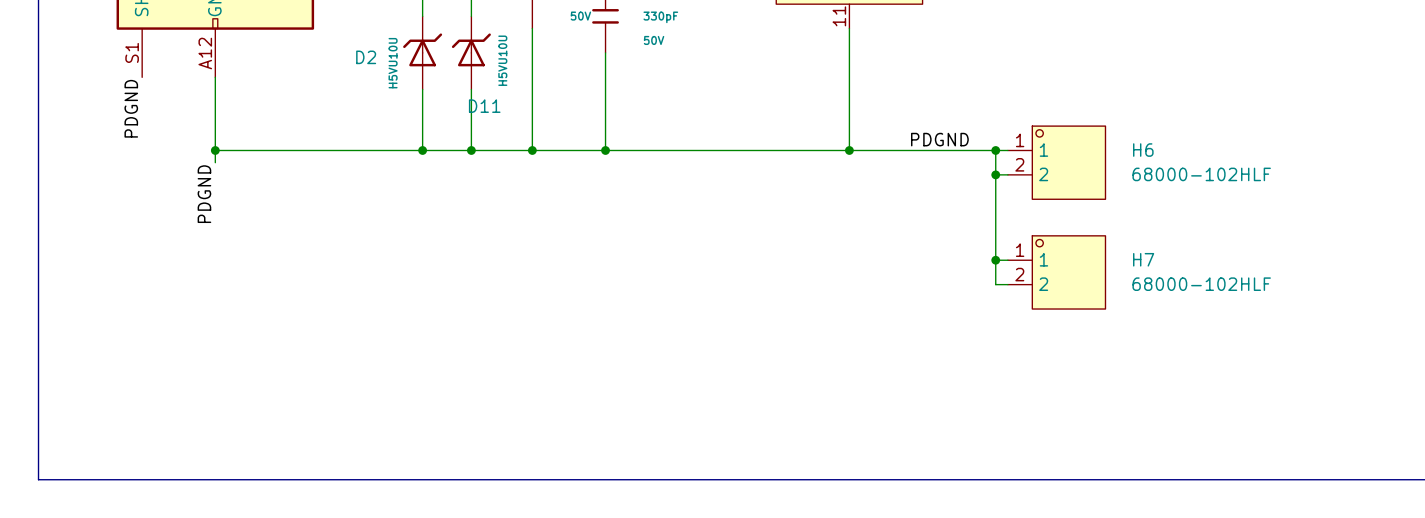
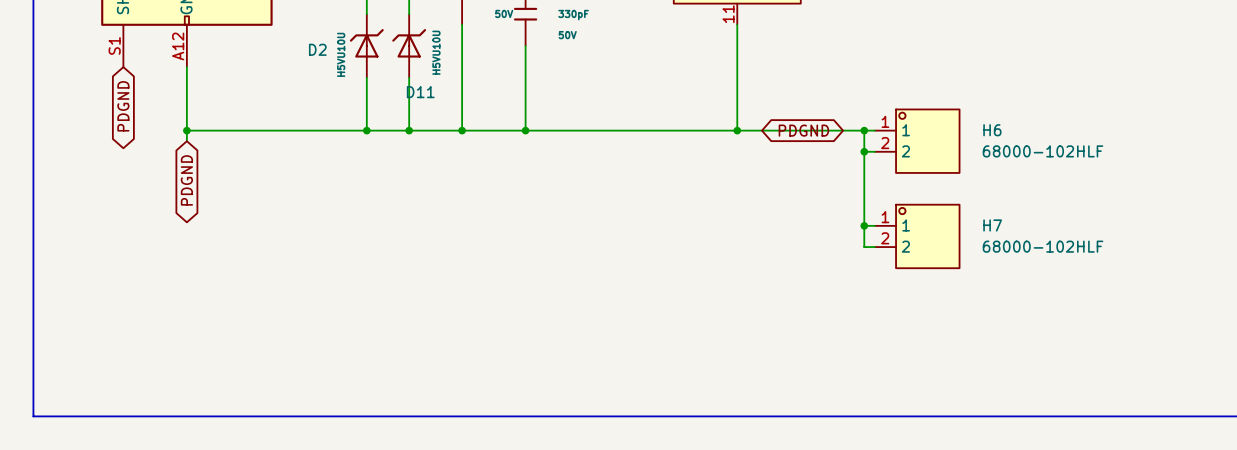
label: PDGND (131, 108) -> none
global label: none -> PDGND (123, 106)
label: PDGND (939, 139) -> none
global label: none -> PDGND (803, 130)
label: PDGND (204, 194) -> none
global label: none -> PDGND (186, 180)

